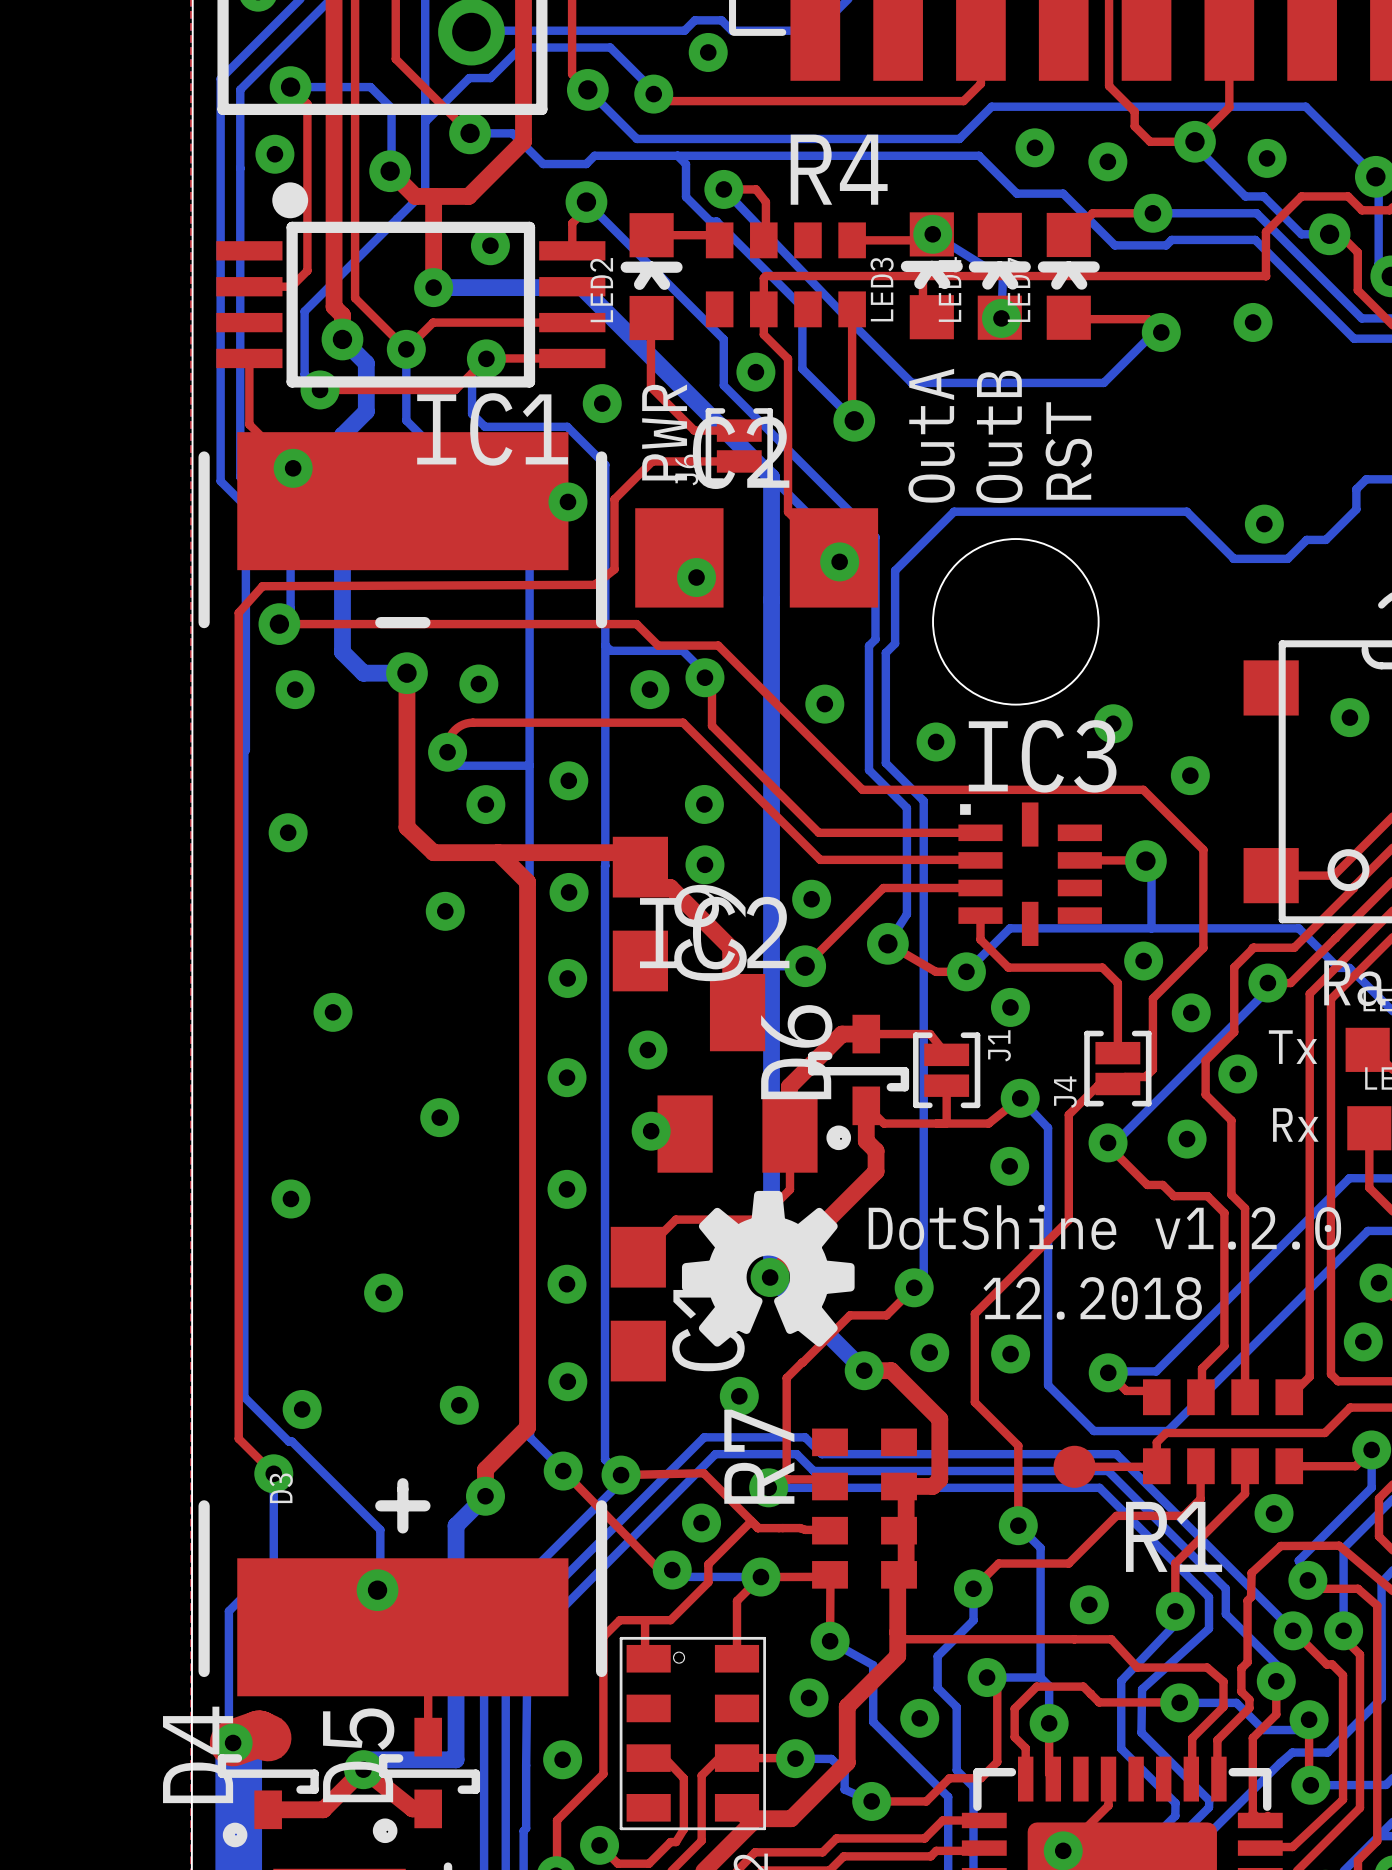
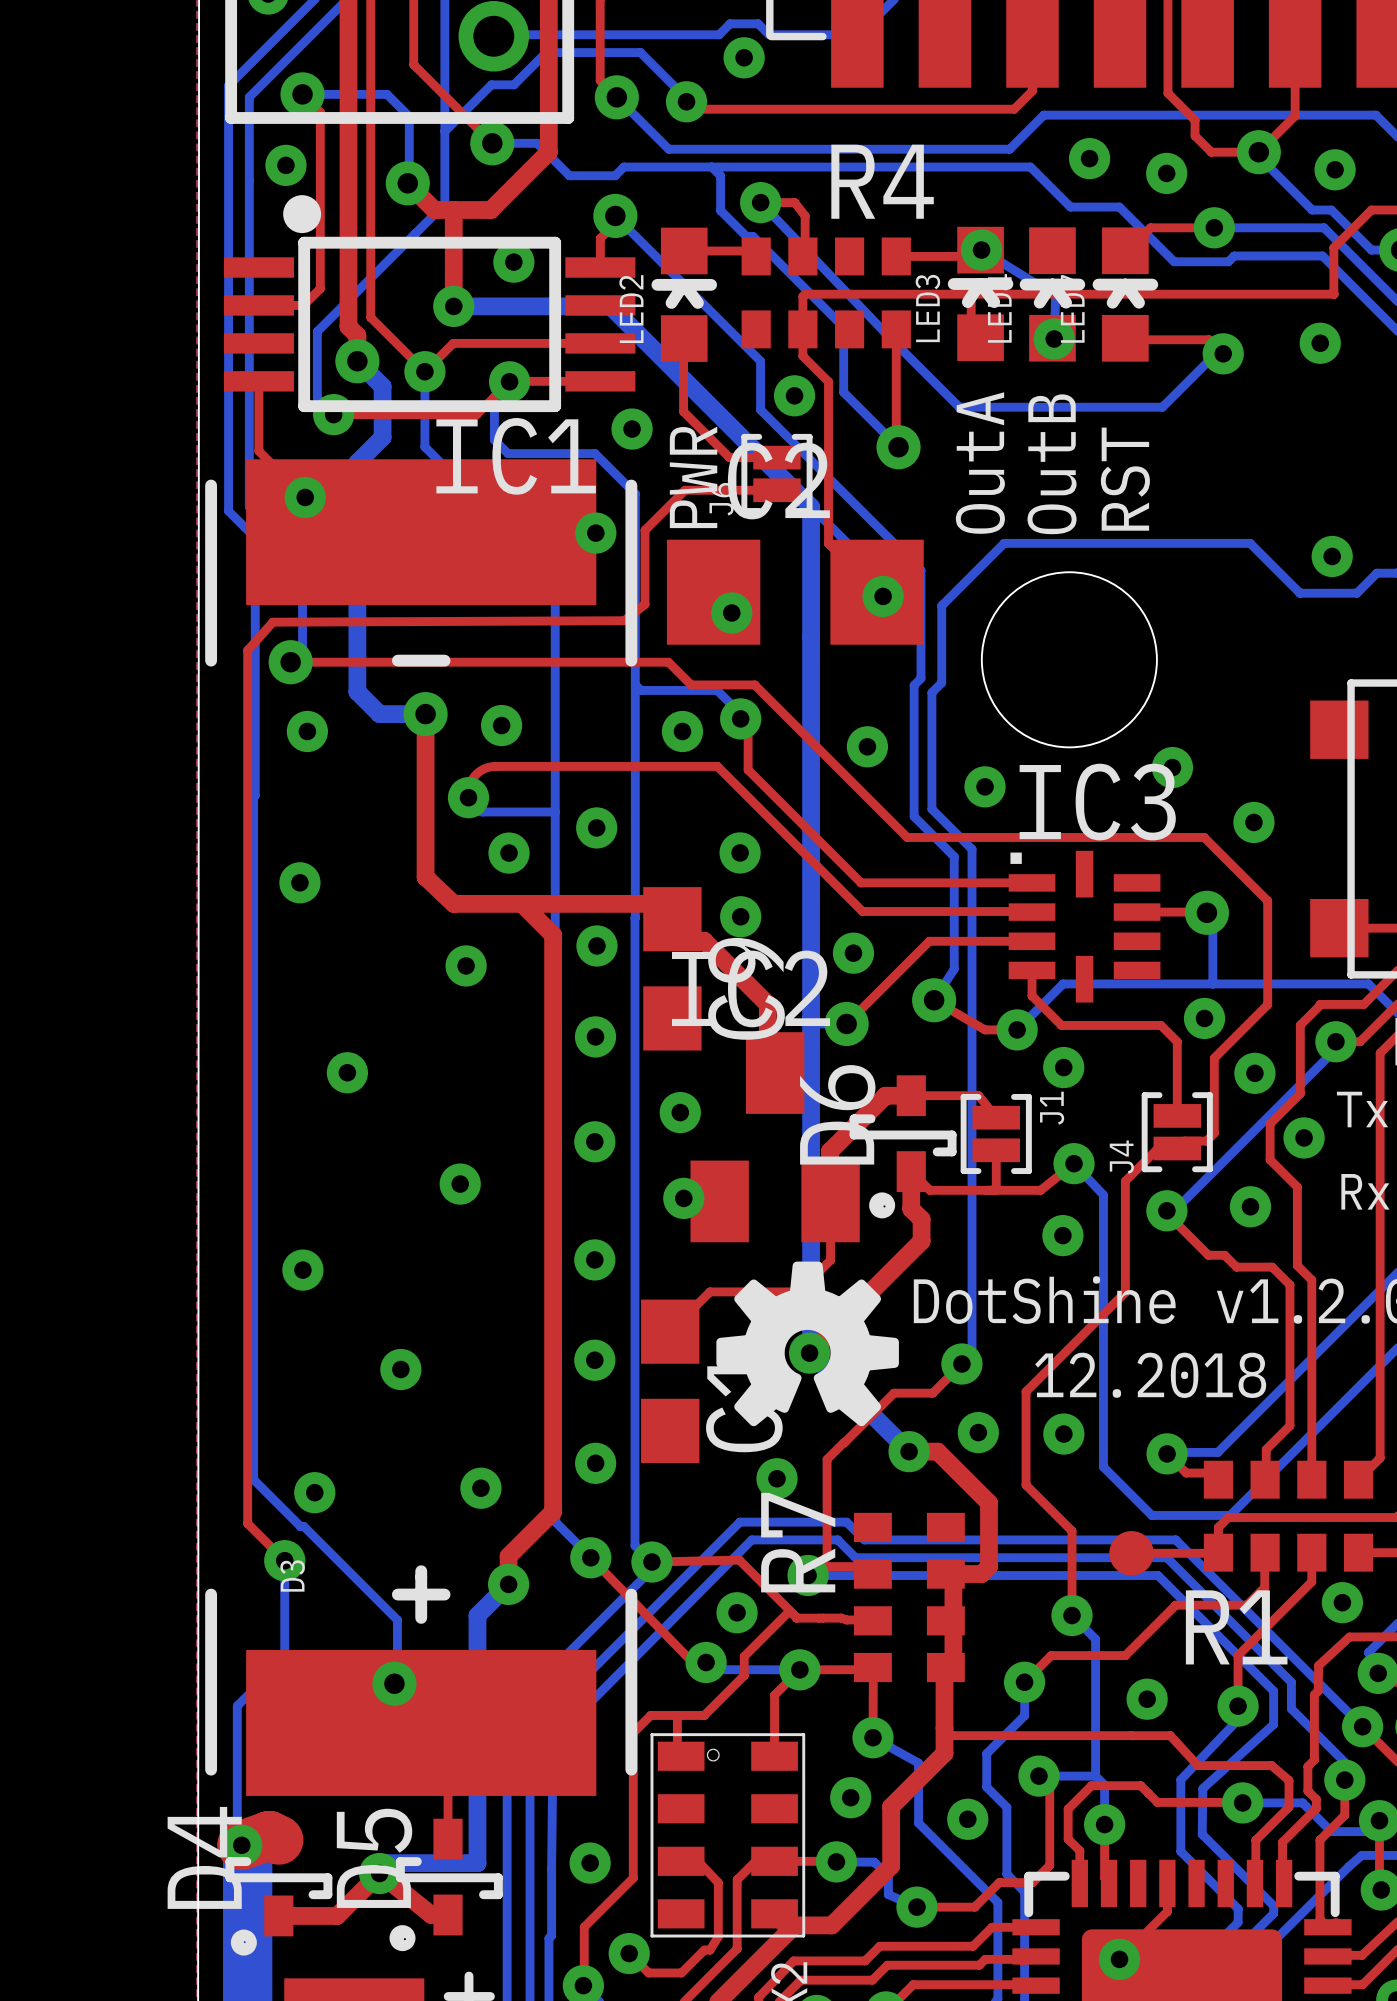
text position: PWR (664, 432) -> PWR (693, 477)

